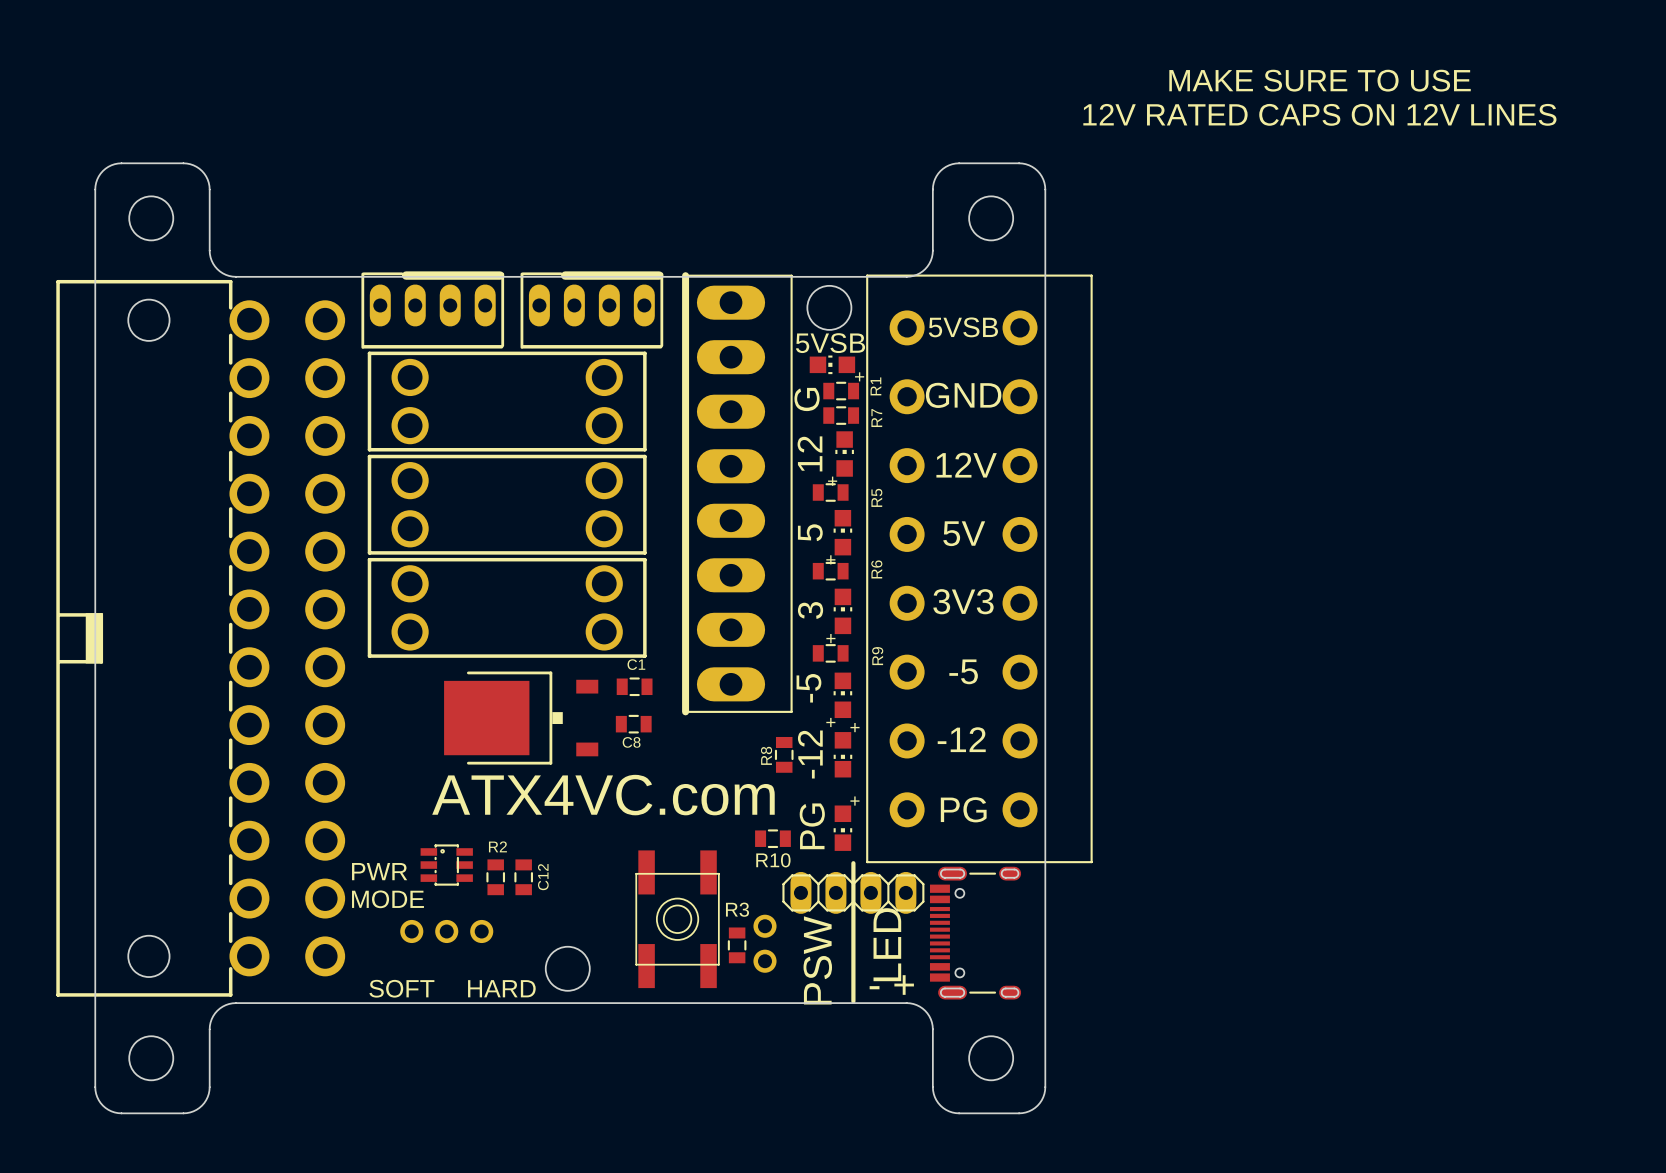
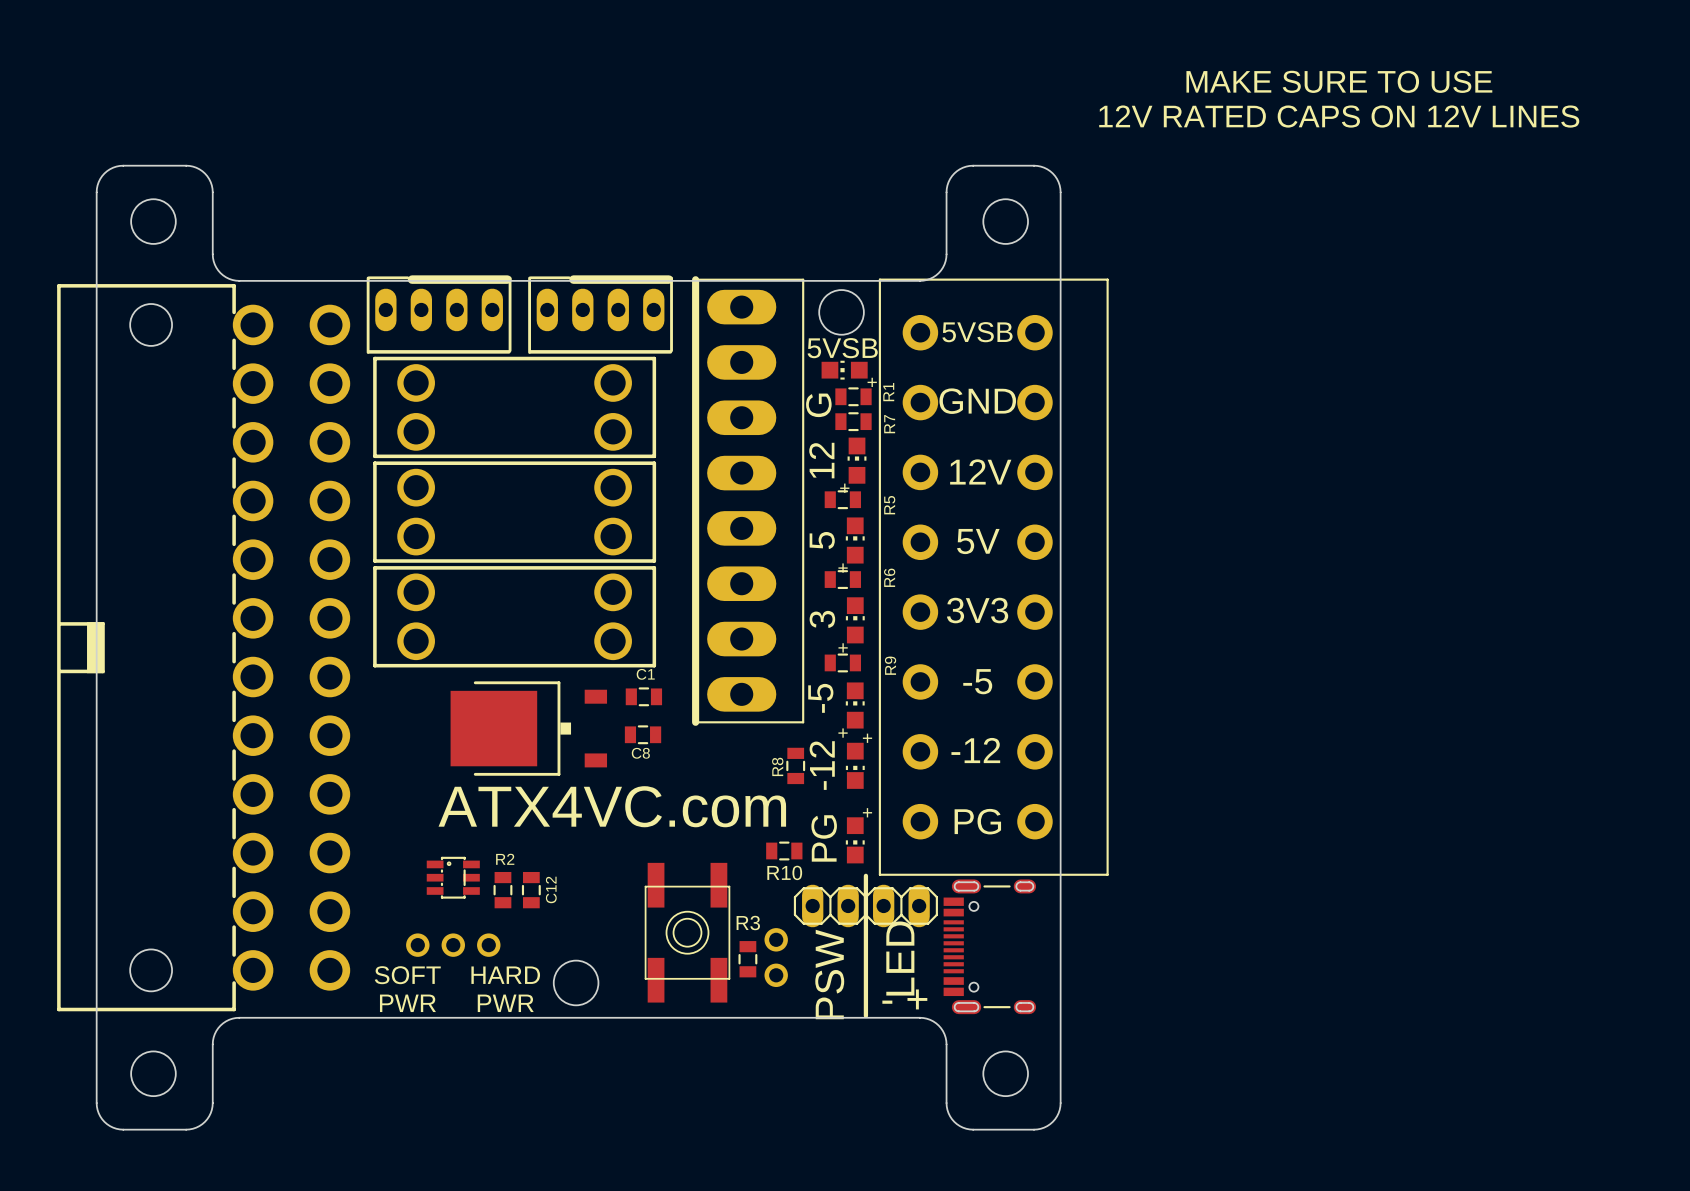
text: PWR (379, 871) -> none
text: MODE (387, 899) -> none
text: none -> SOFT (407, 975)
text: none -> HARD (505, 975)
text: SOFT (401, 988) -> PWR (407, 1003)
text: HARD (501, 988) -> PWR (505, 1003)

